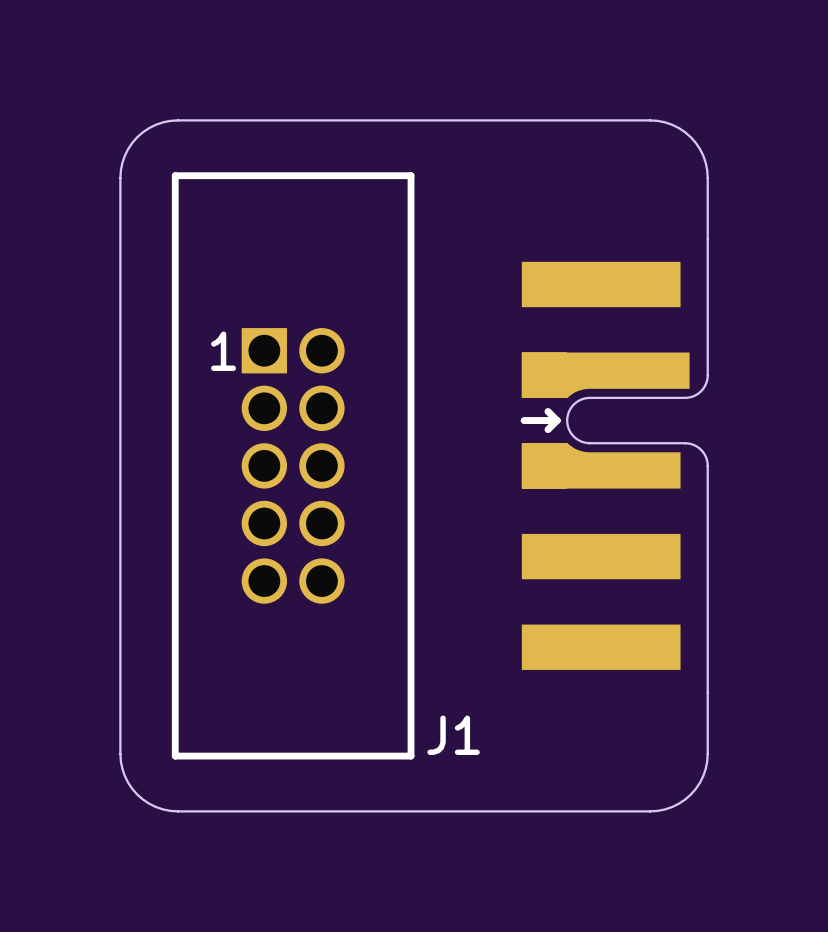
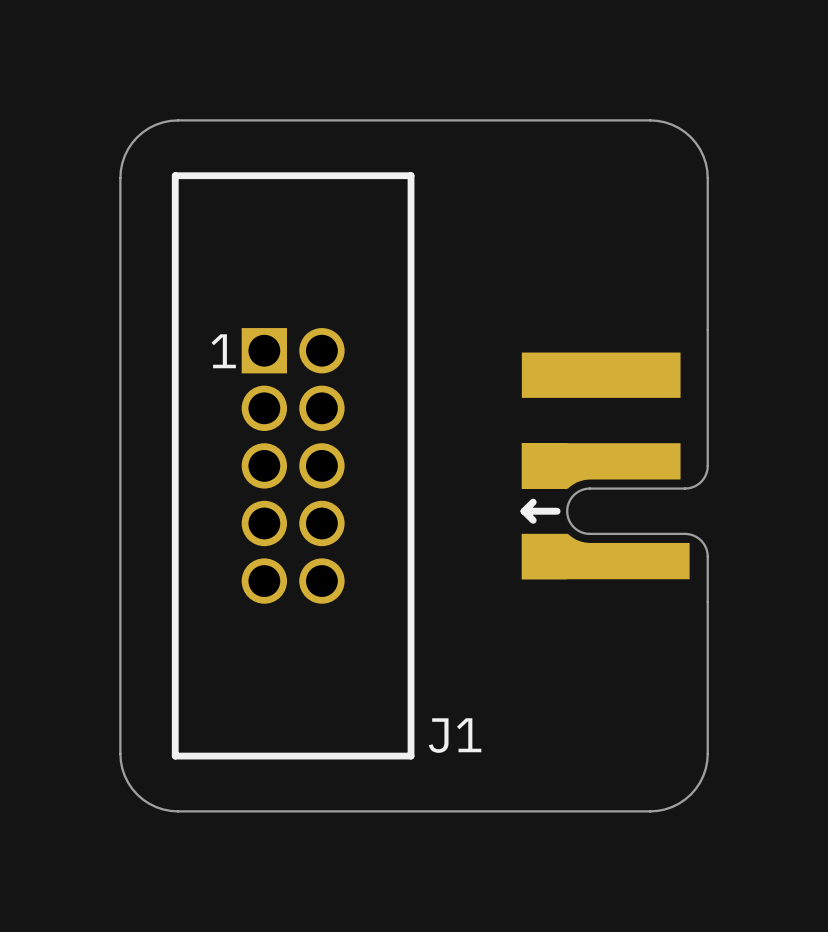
part footprint: [520, 238, 709, 694] -> [520, 328, 709, 604]

